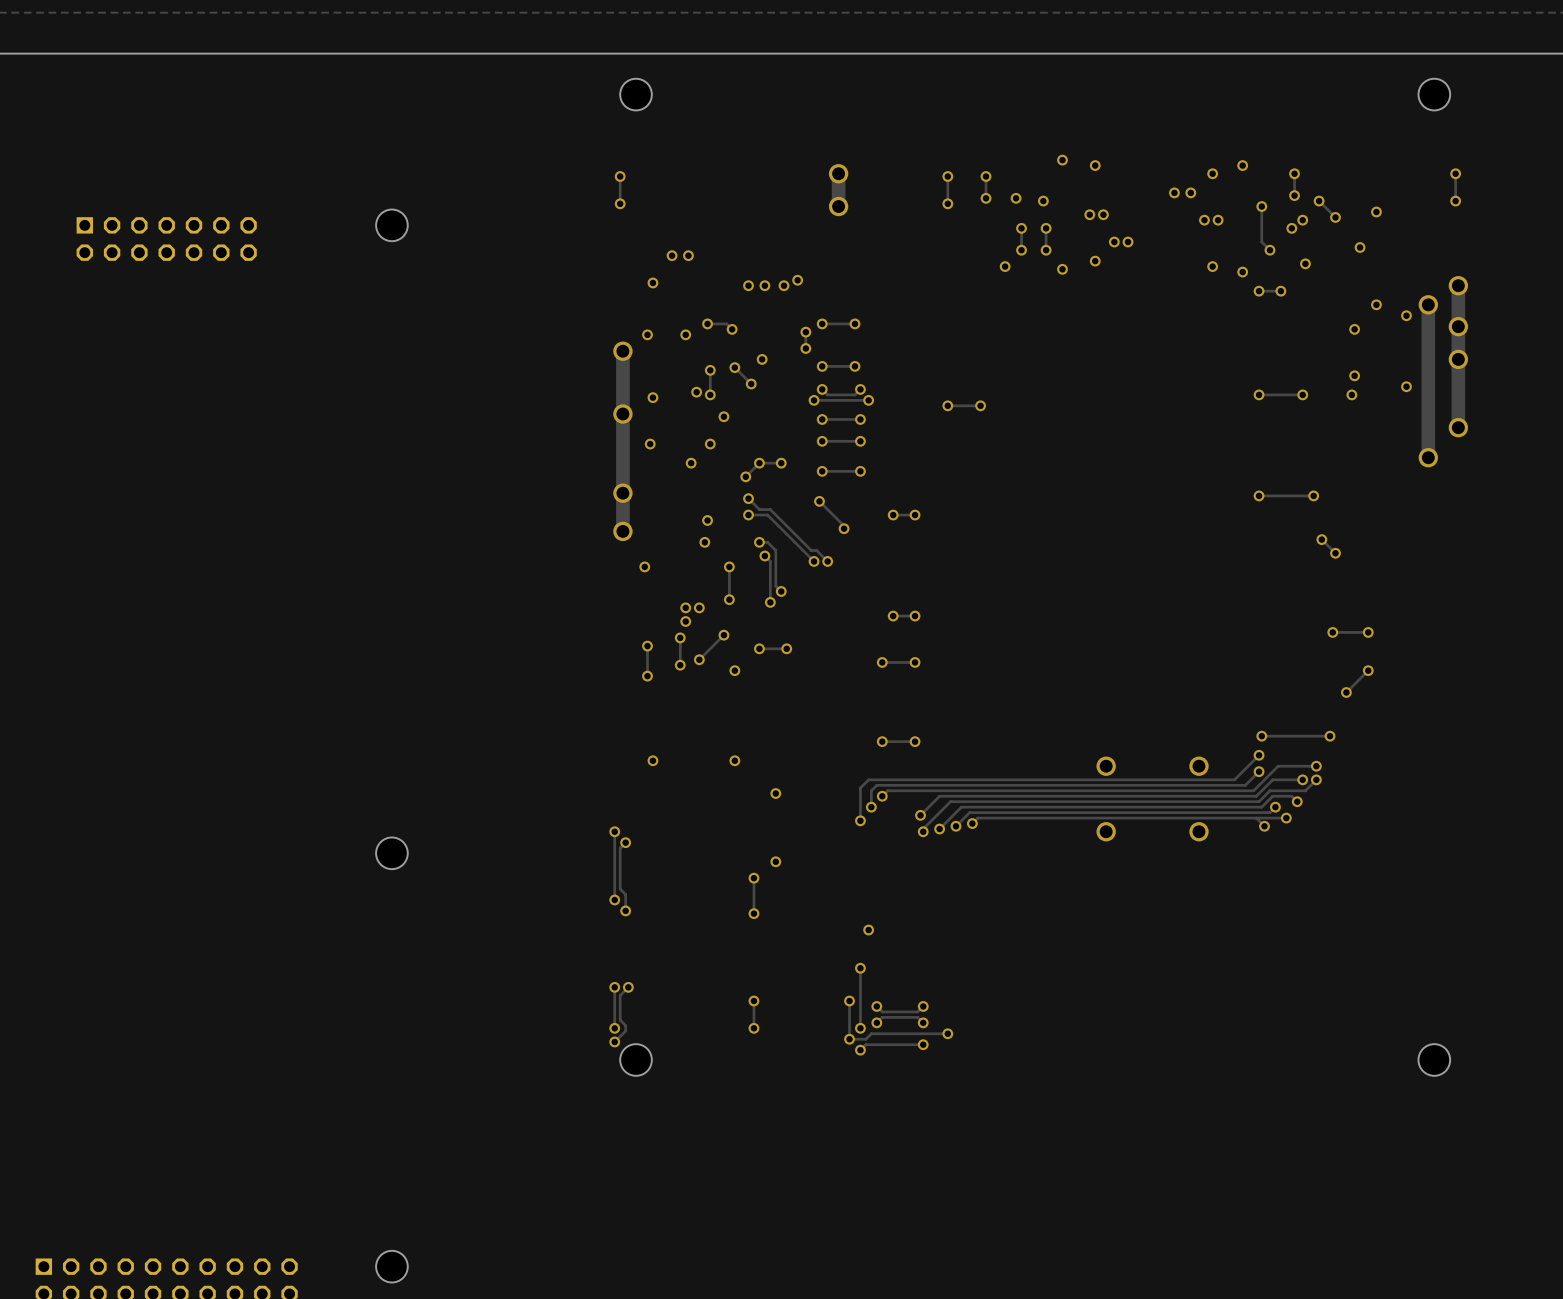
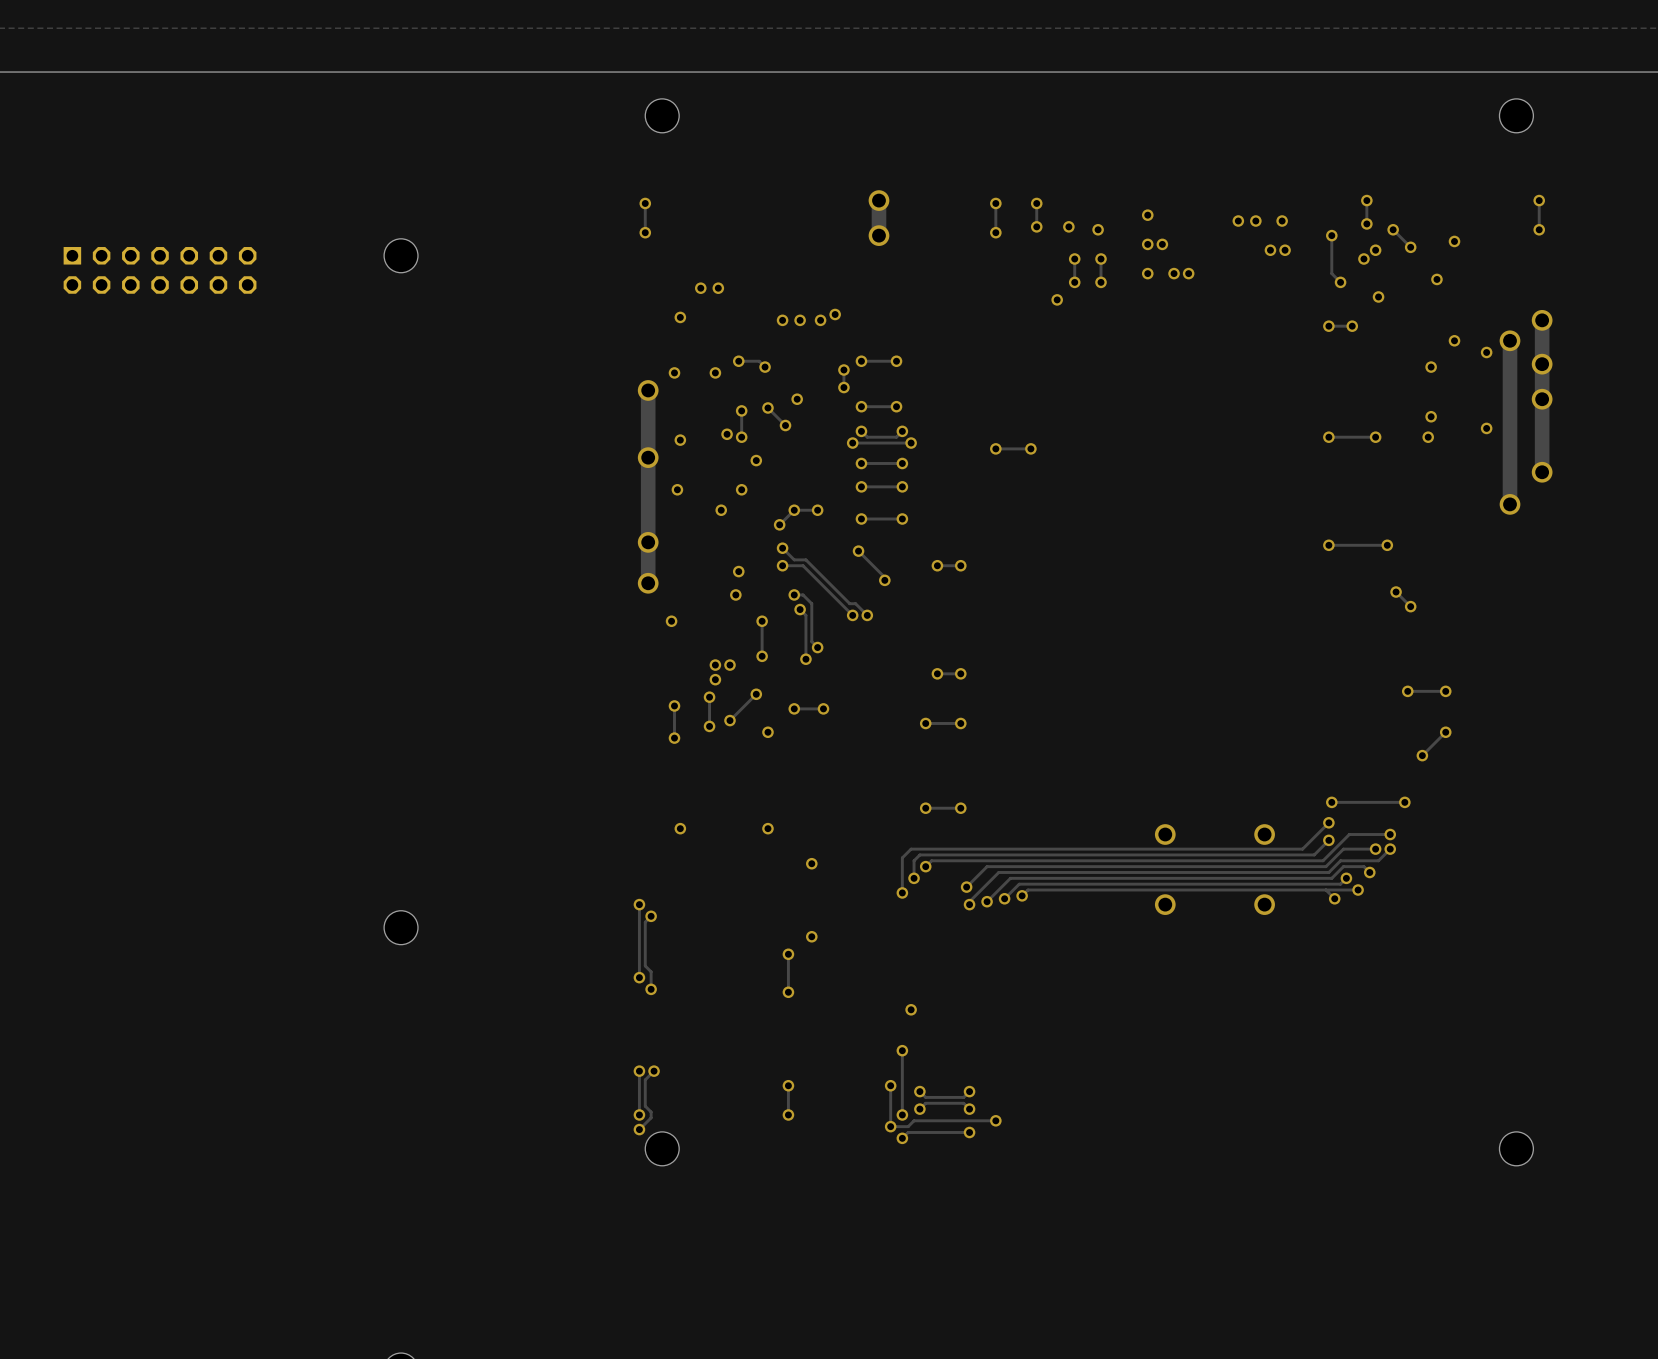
via: (1062, 160) -> none
via: (1095, 165) -> none
via: (1242, 165) -> none
via: (1212, 173) -> none
via: none -> (1147, 215)
via: none -> (1282, 221)
via: none -> (1147, 273)
via: (1095, 261) -> none
via: (1212, 266) -> none
via: (1062, 269) -> none
via: (1242, 272) -> none

